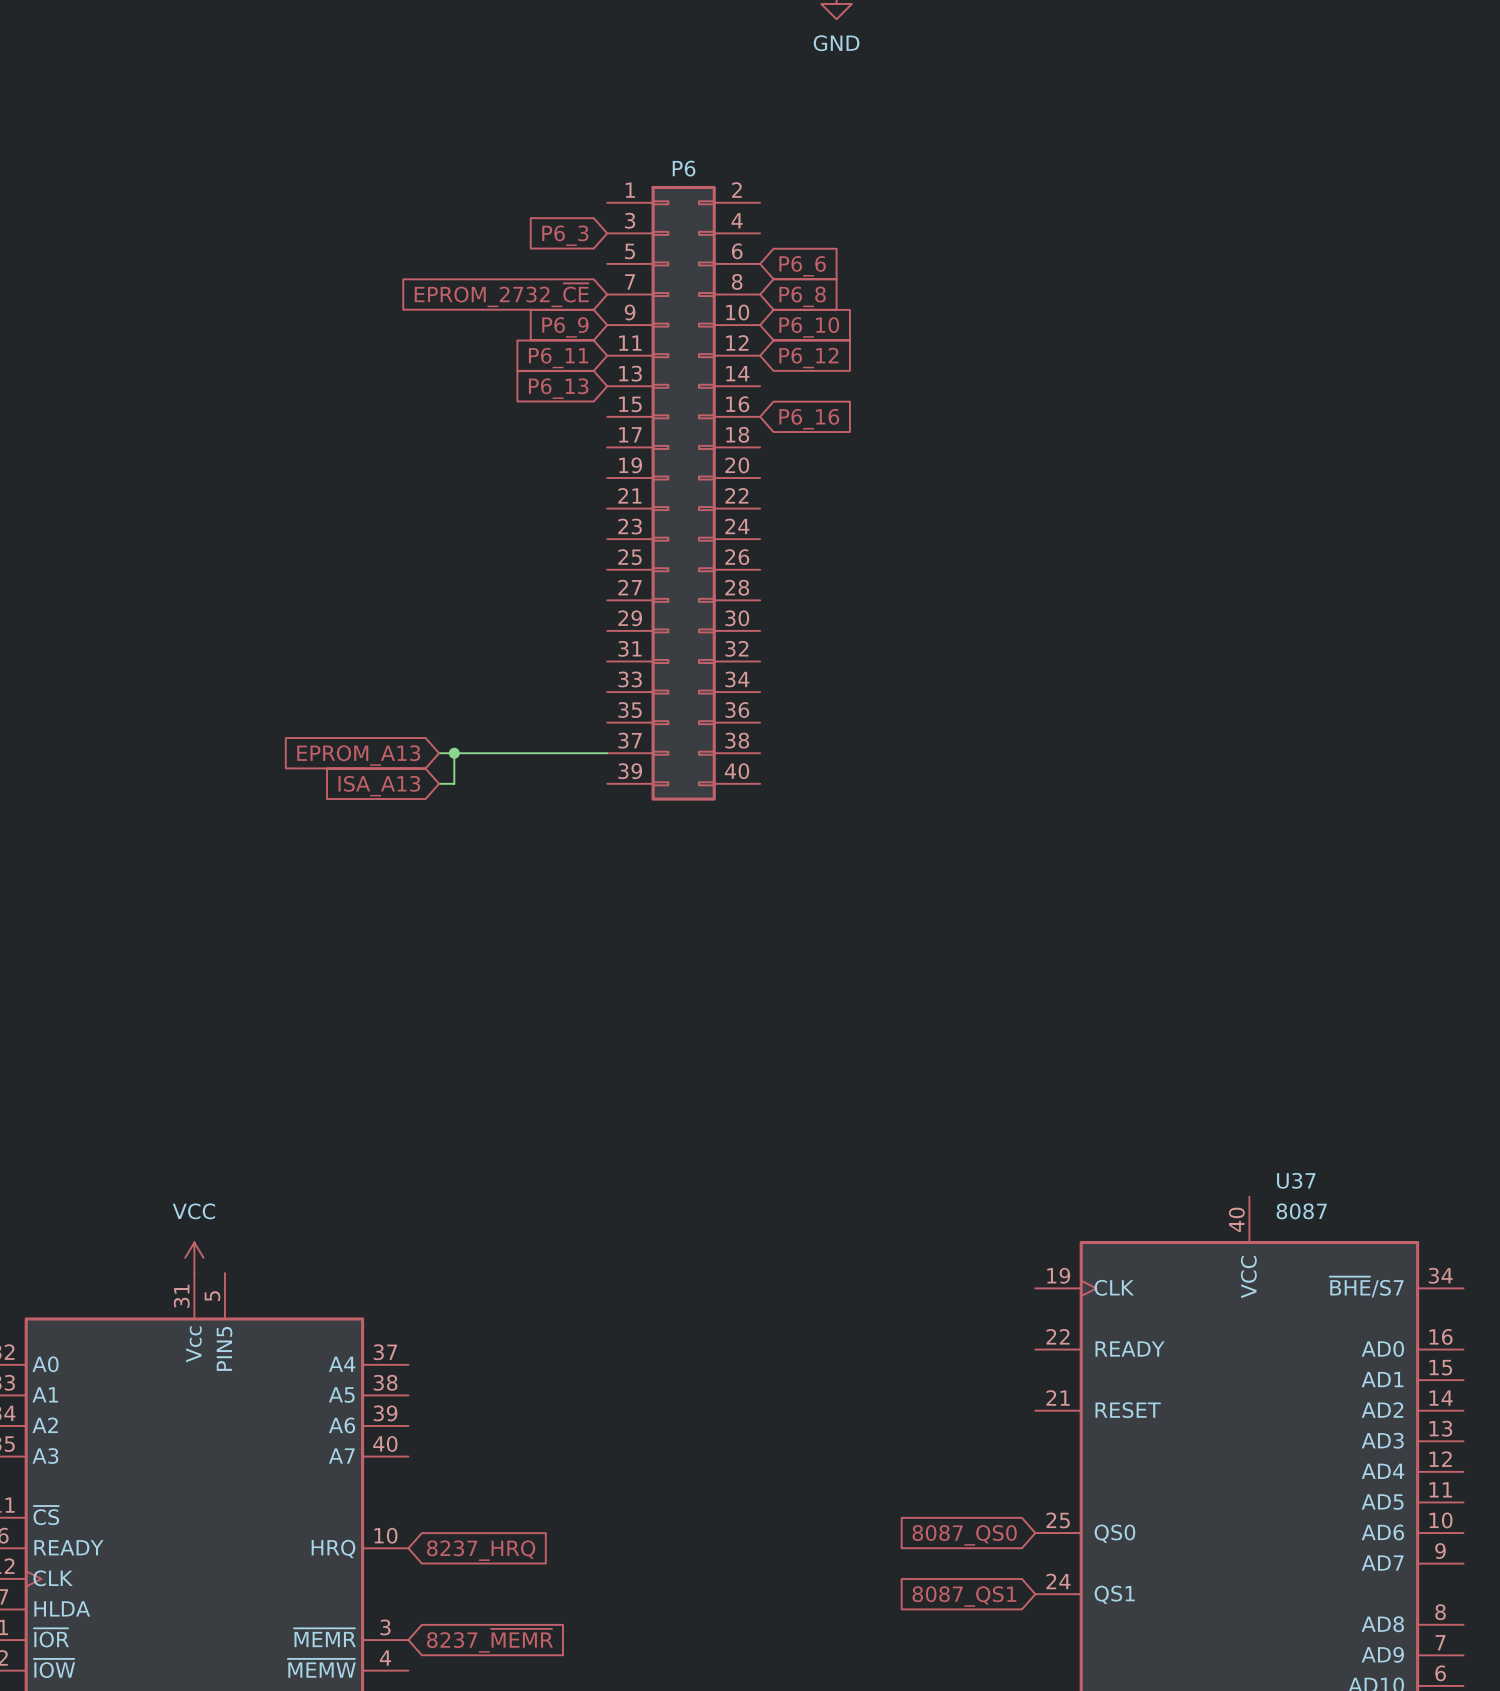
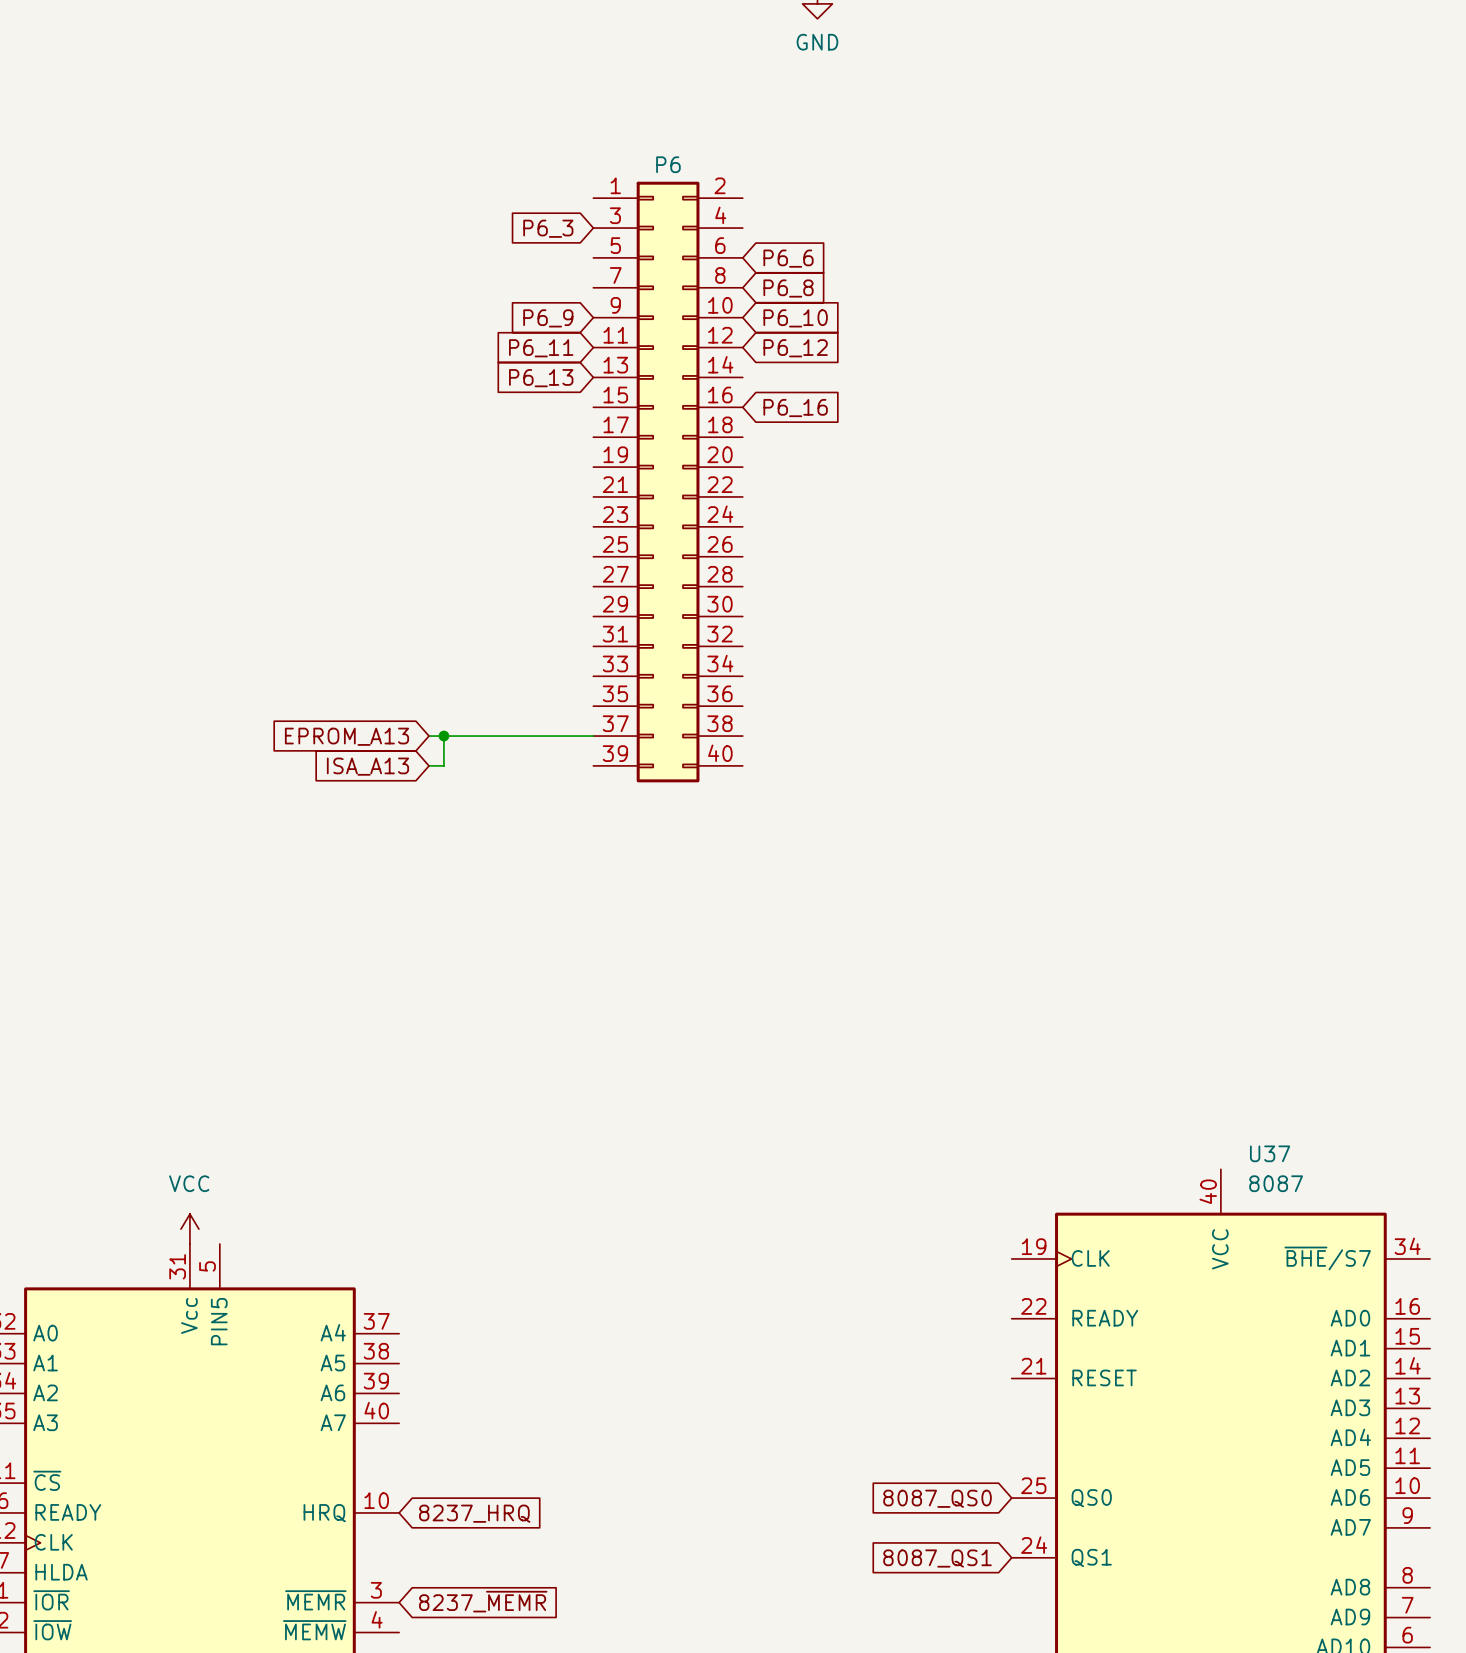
global label: EPROM_2732_~{CE} (501, 295) -> none

